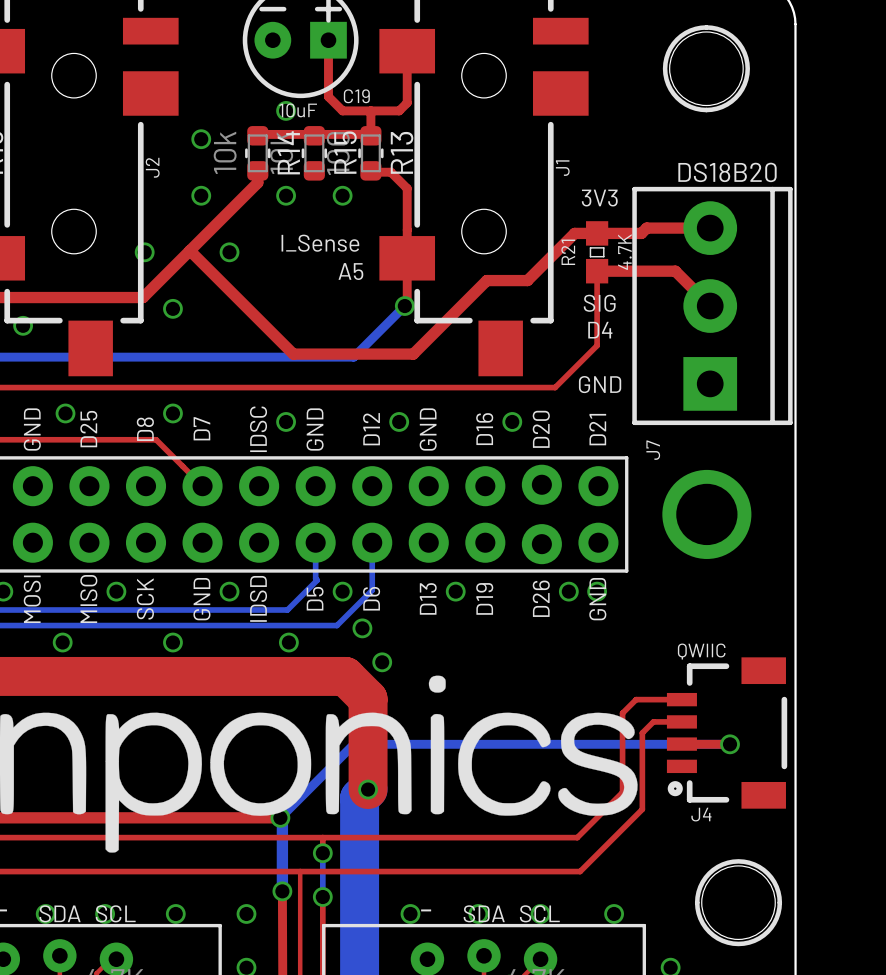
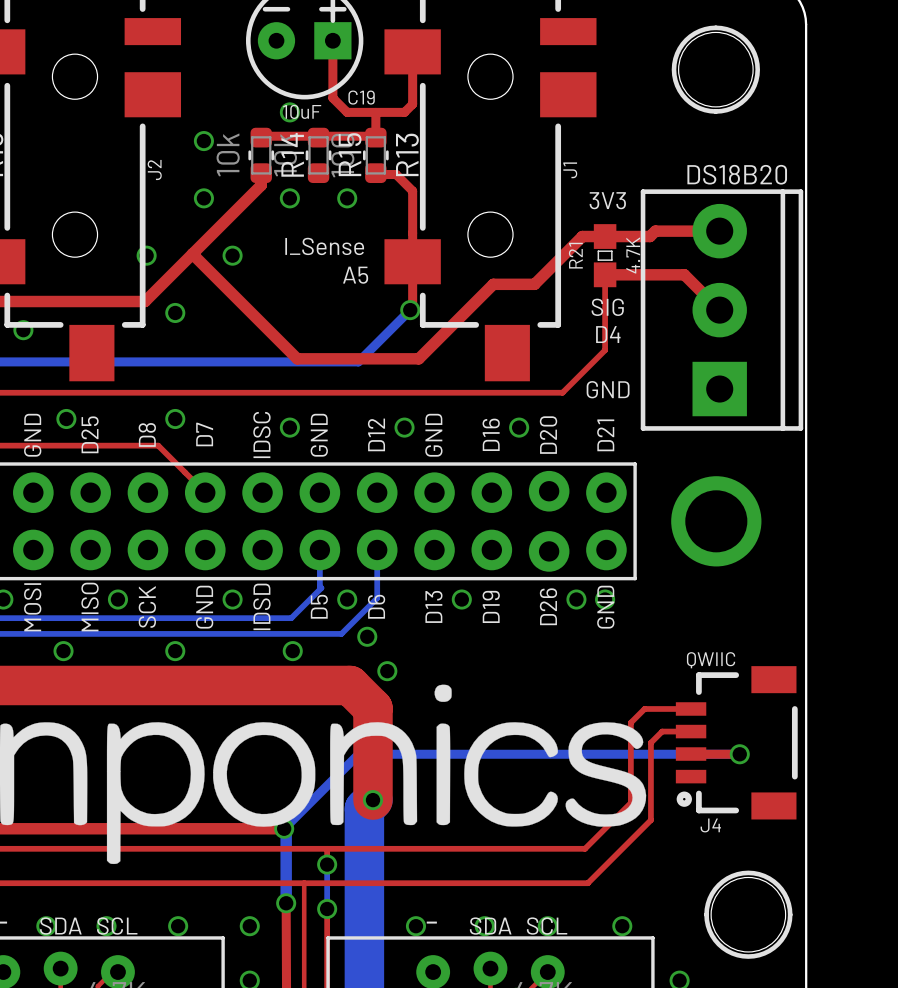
J7 name: J7 (653, 450) -> none

